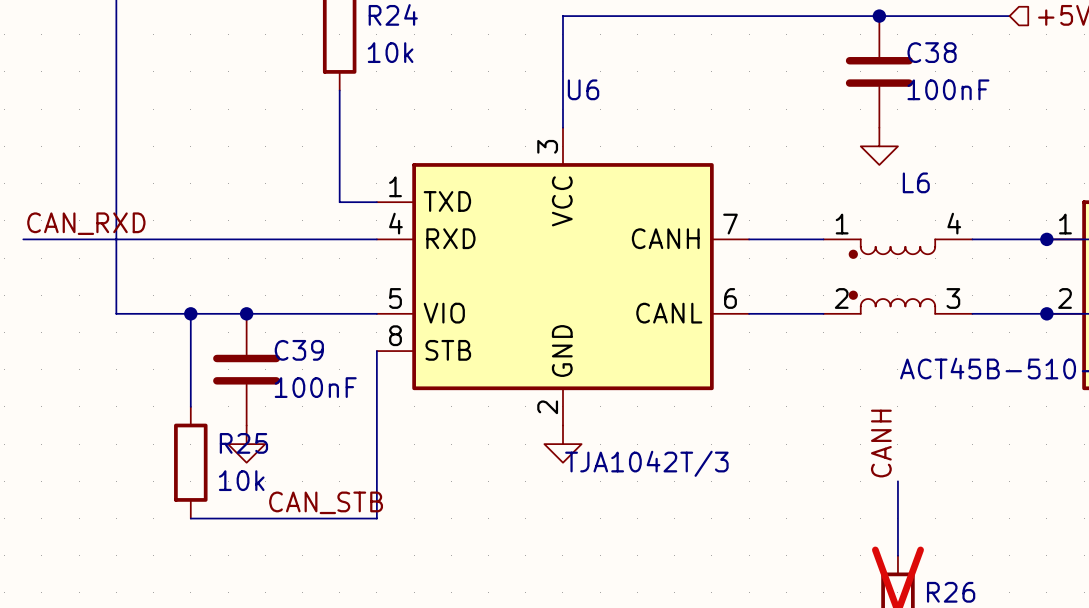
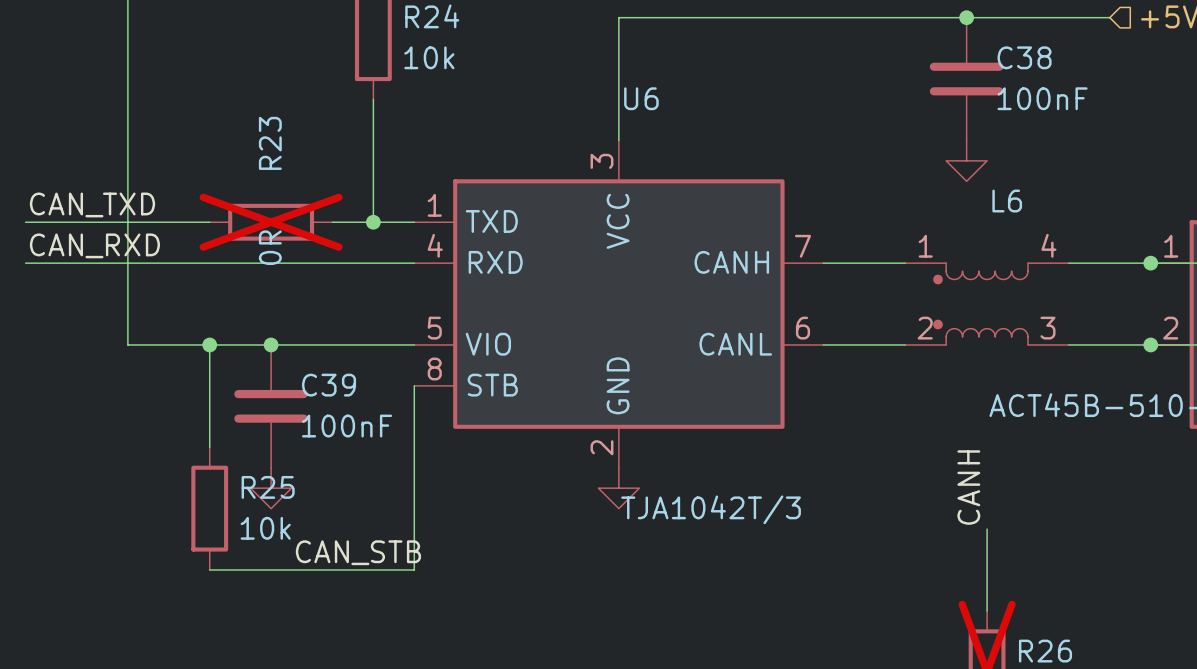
label: none -> CAN_TXD (92, 204)
wire: none -> (25, 222) (209, 222)
R23: none -> 0R (271, 222)
wire: none -> (332, 222) (373, 222)
junction: none -> (373, 222)

